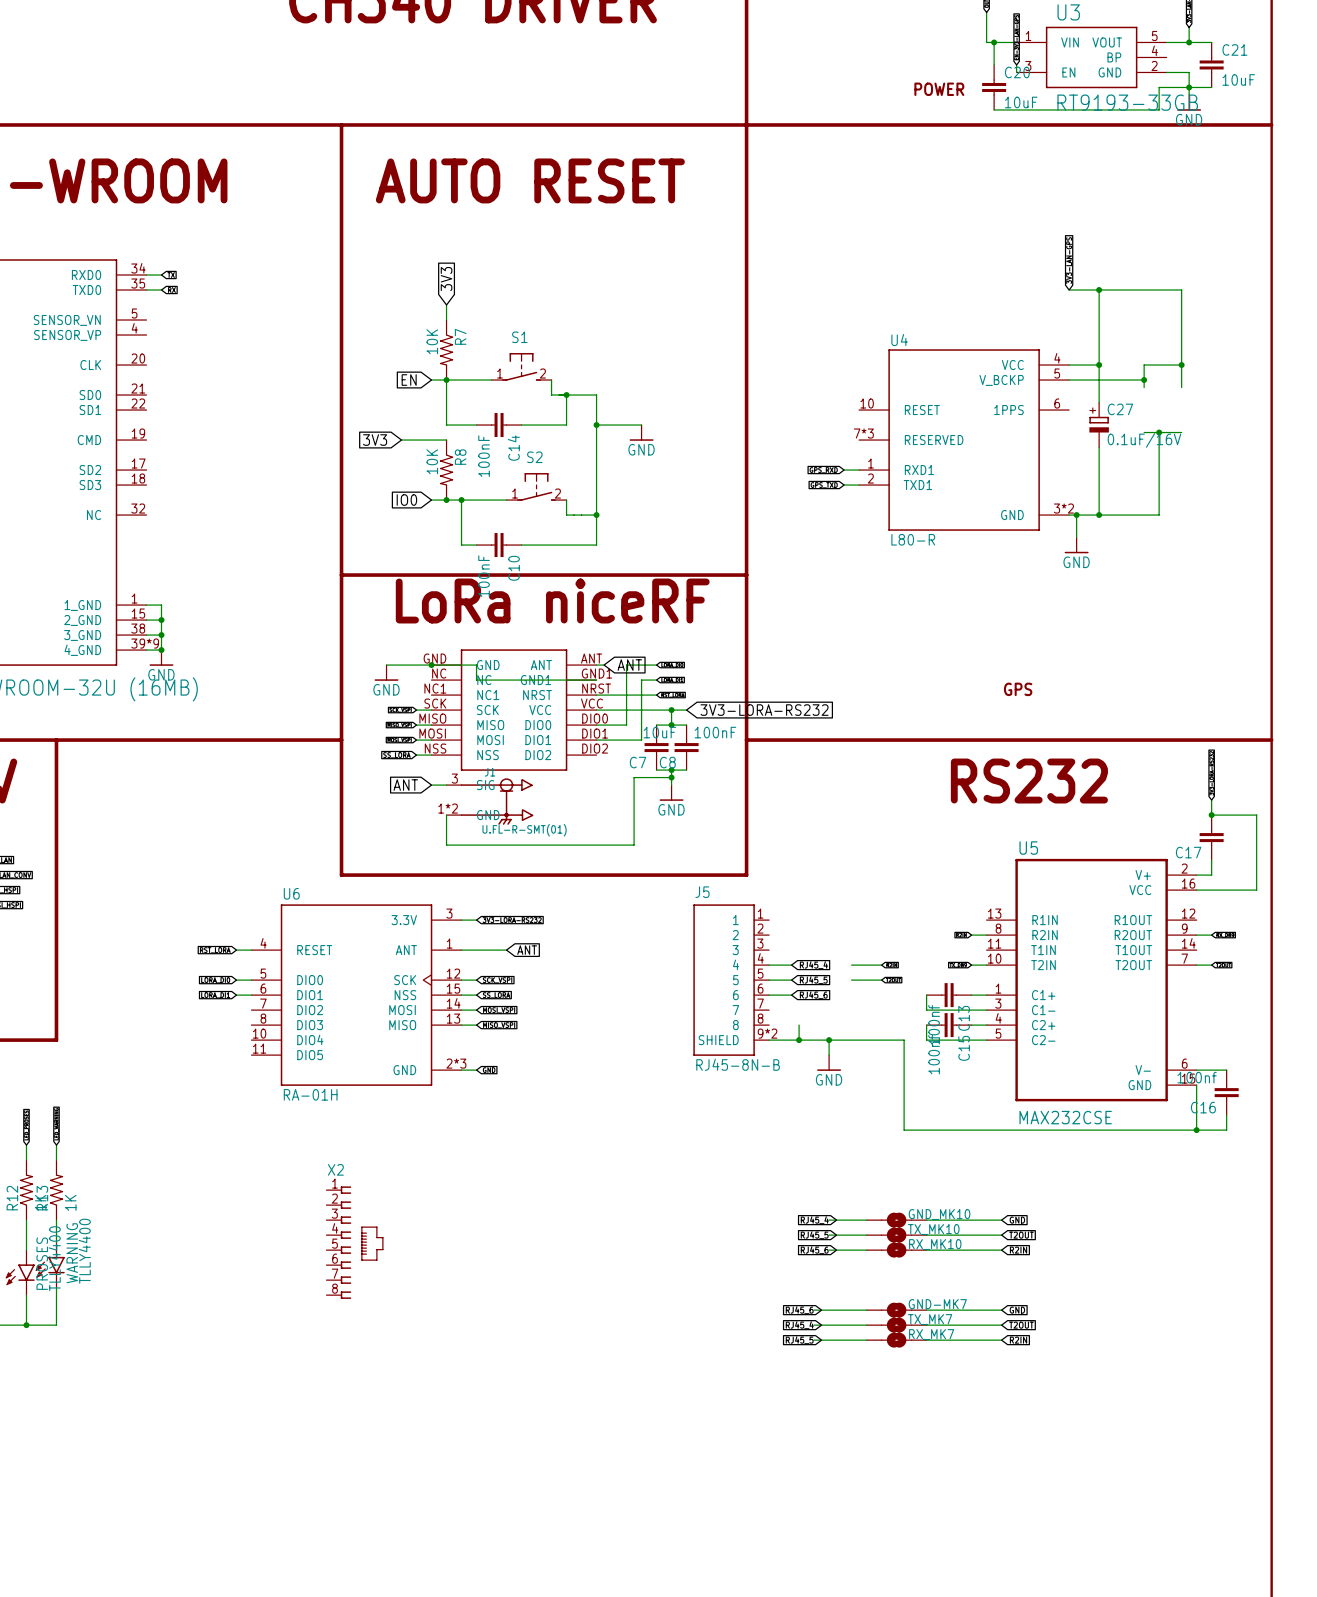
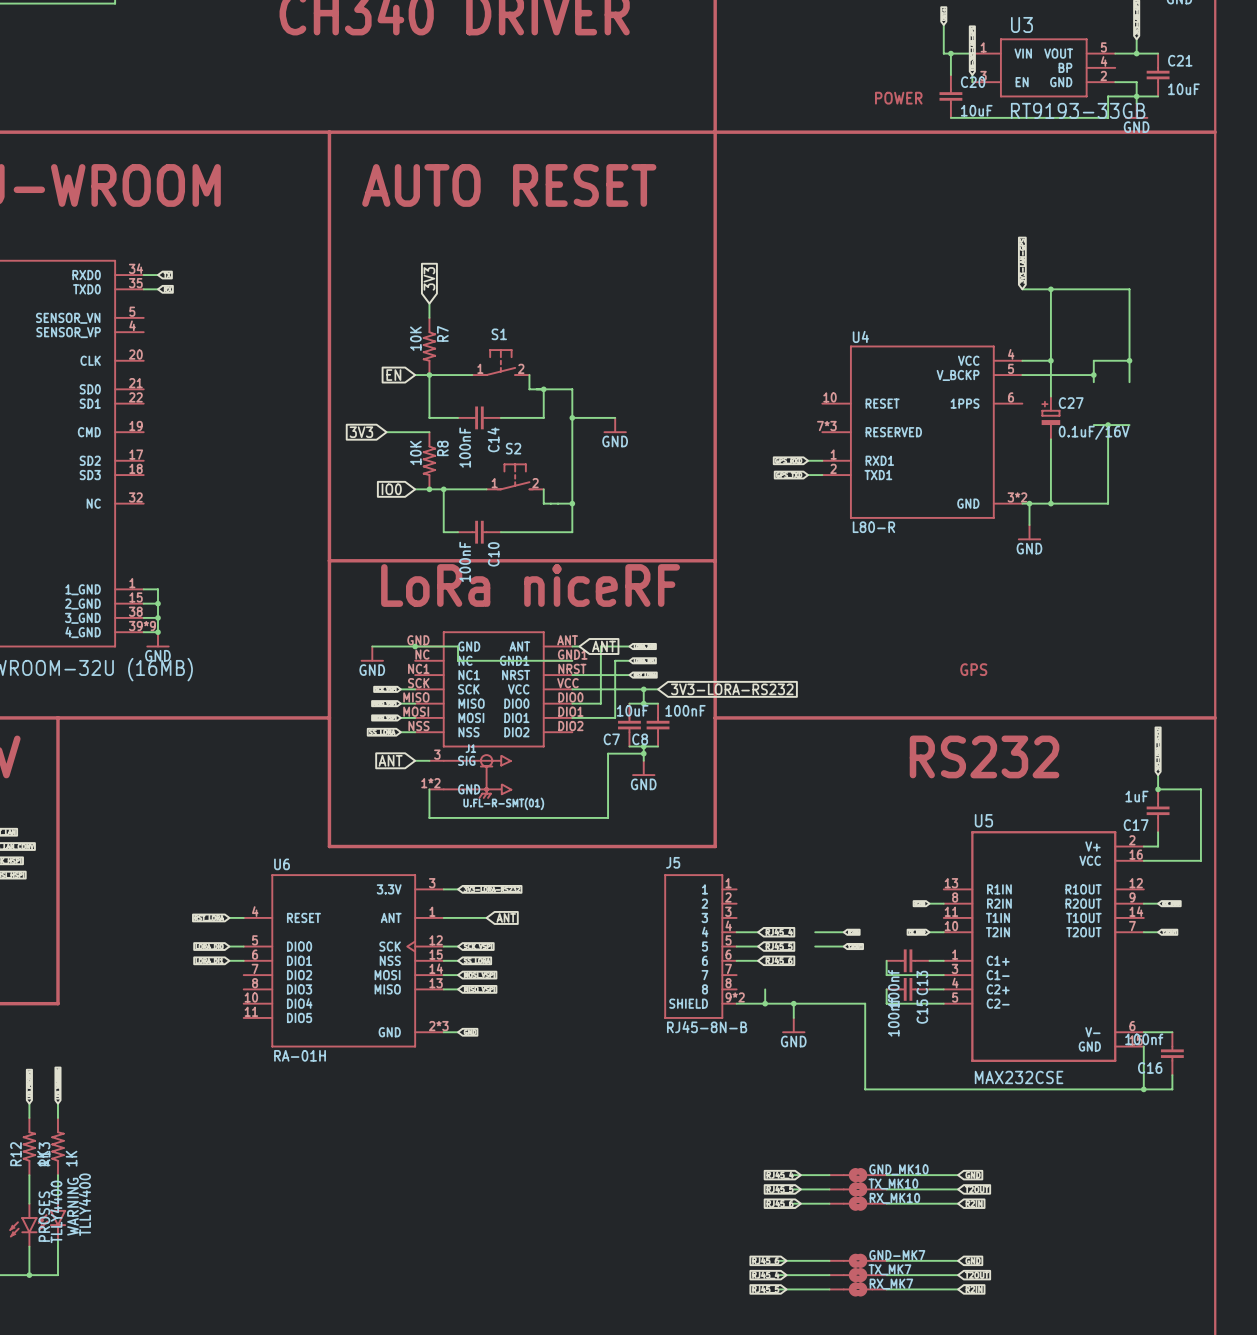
C17 value: none -> 1uF (1136, 796)
X2: (355, 1242) -> none

